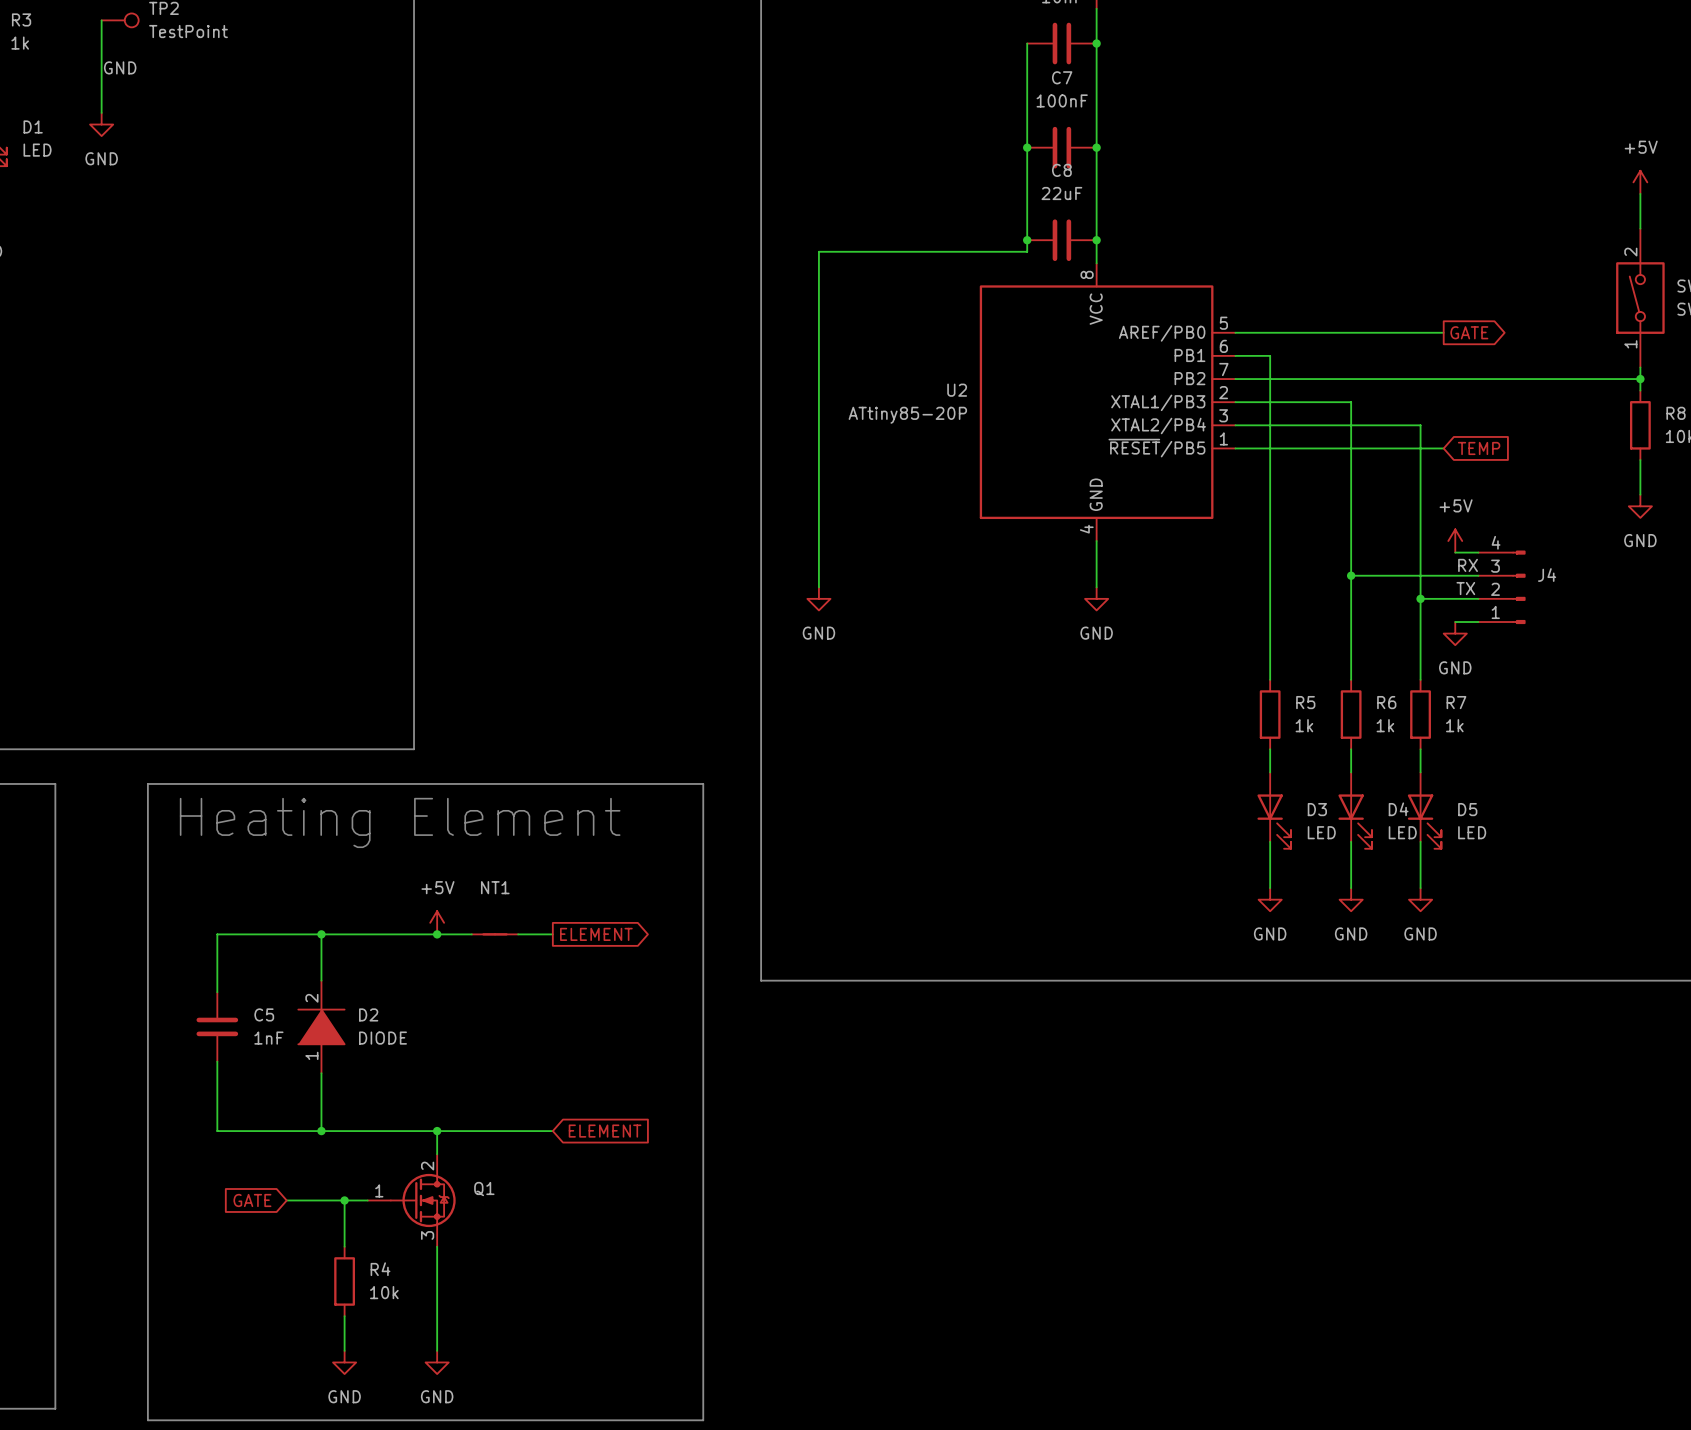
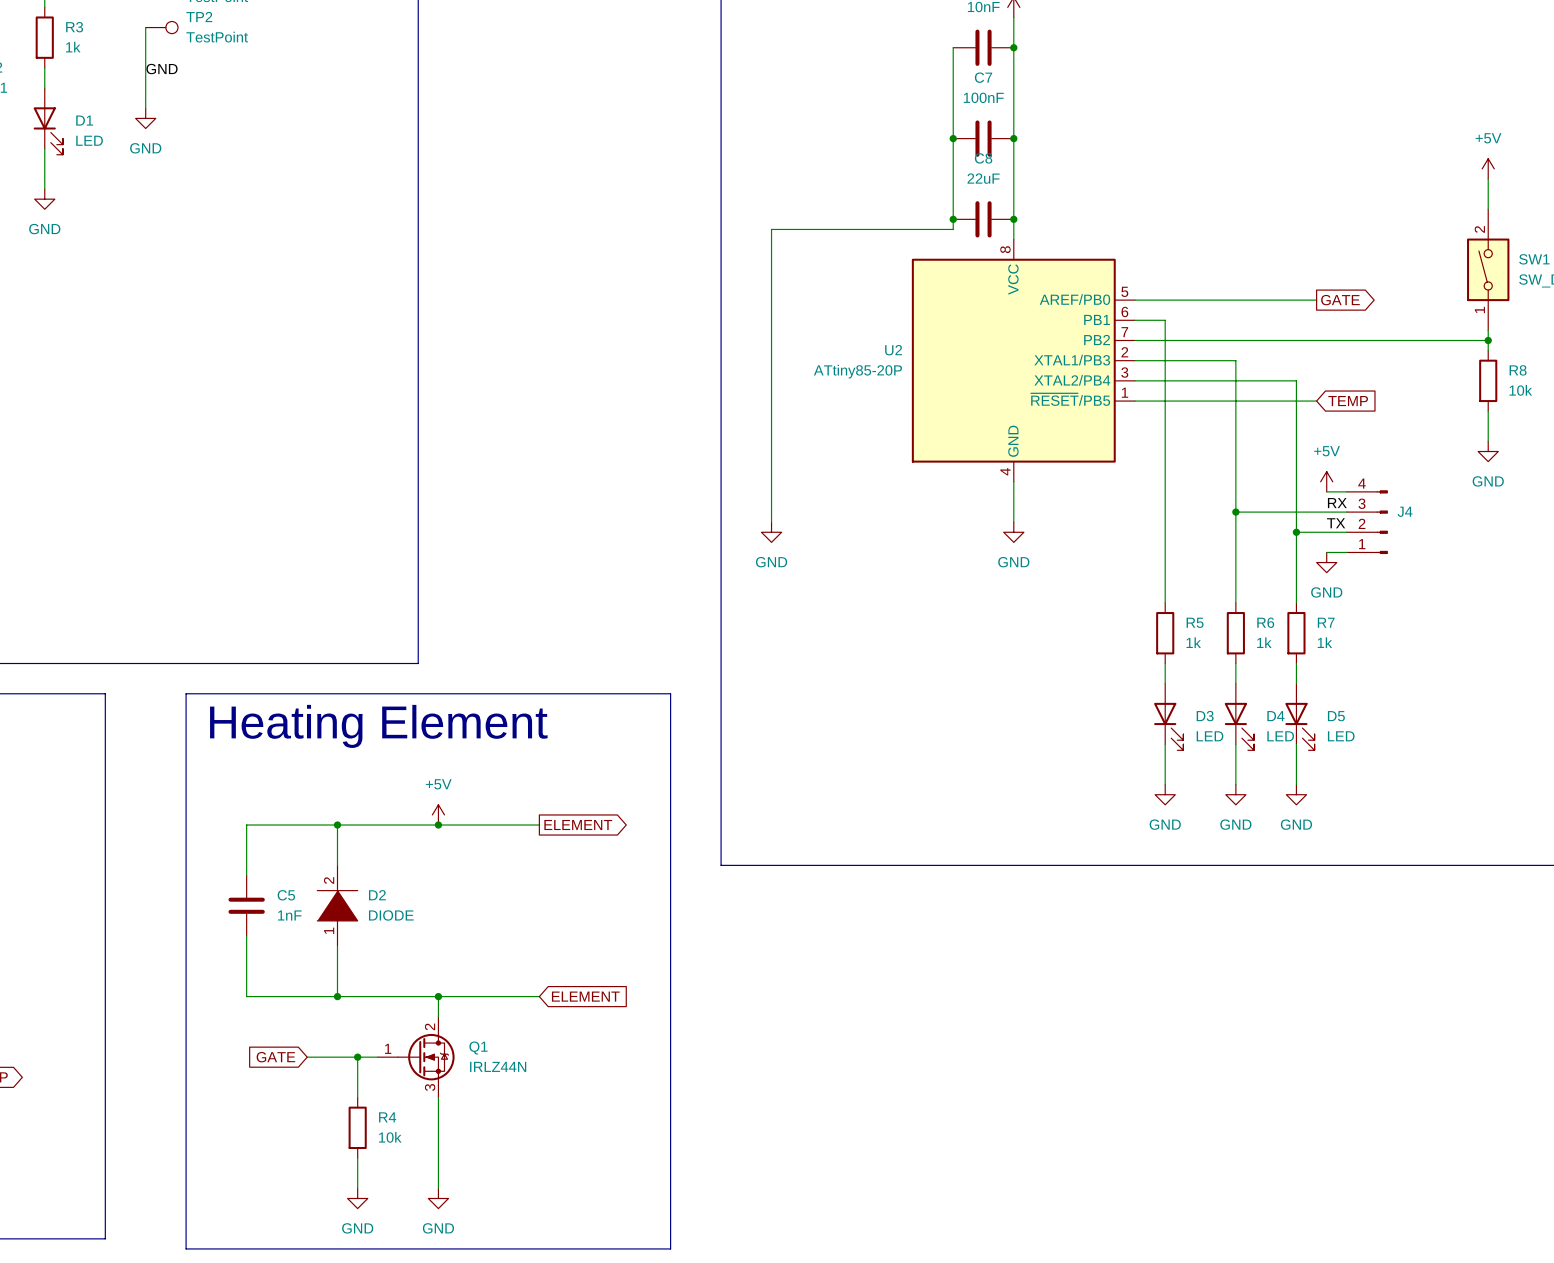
NT1: (495, 934) -> none
Q1 value: none -> IRLZ44N (498, 1066)

